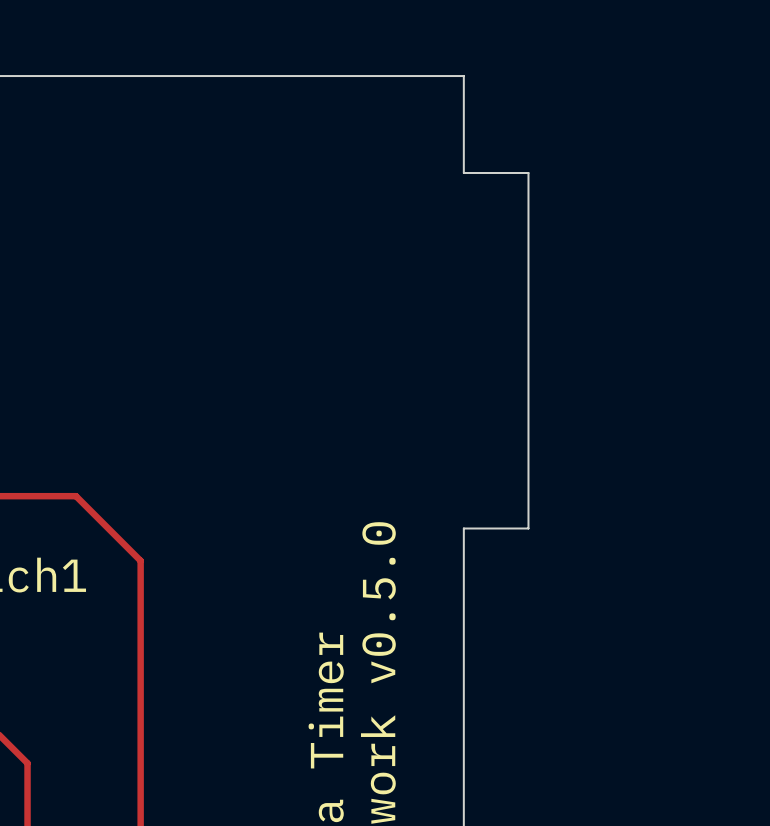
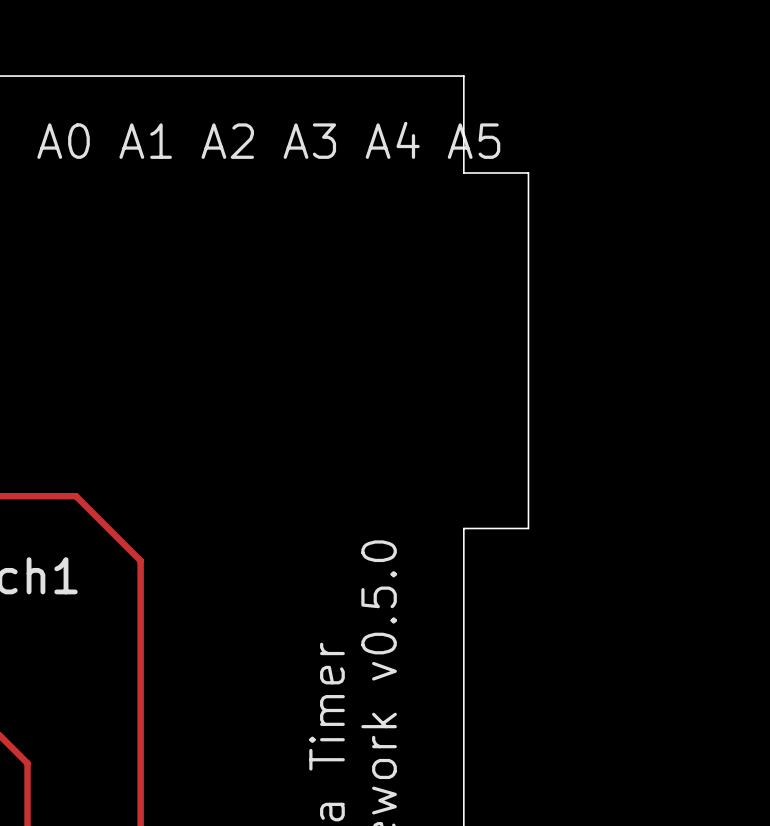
text: none -> A2 (227, 141)
text: none -> A0 (63, 141)
text: none -> A1 (145, 141)
text: none -> A3 (309, 141)
text: none -> A4 (392, 140)
text: none -> A5 (474, 141)

